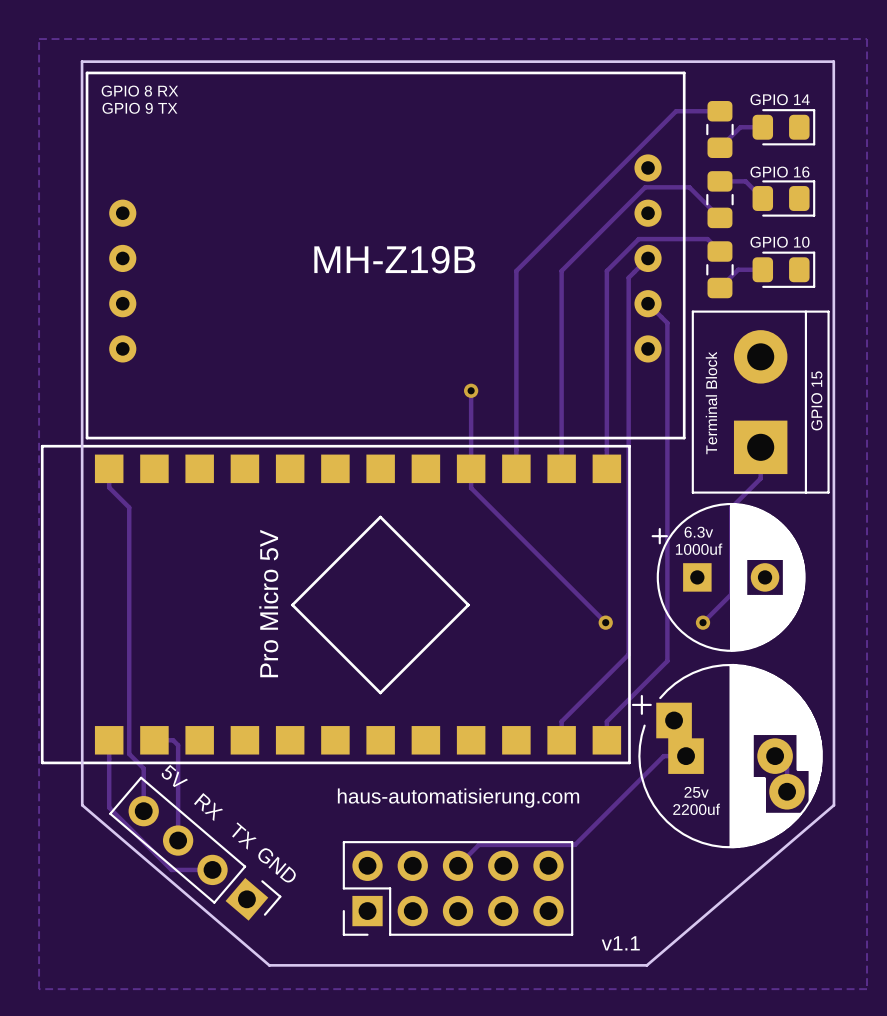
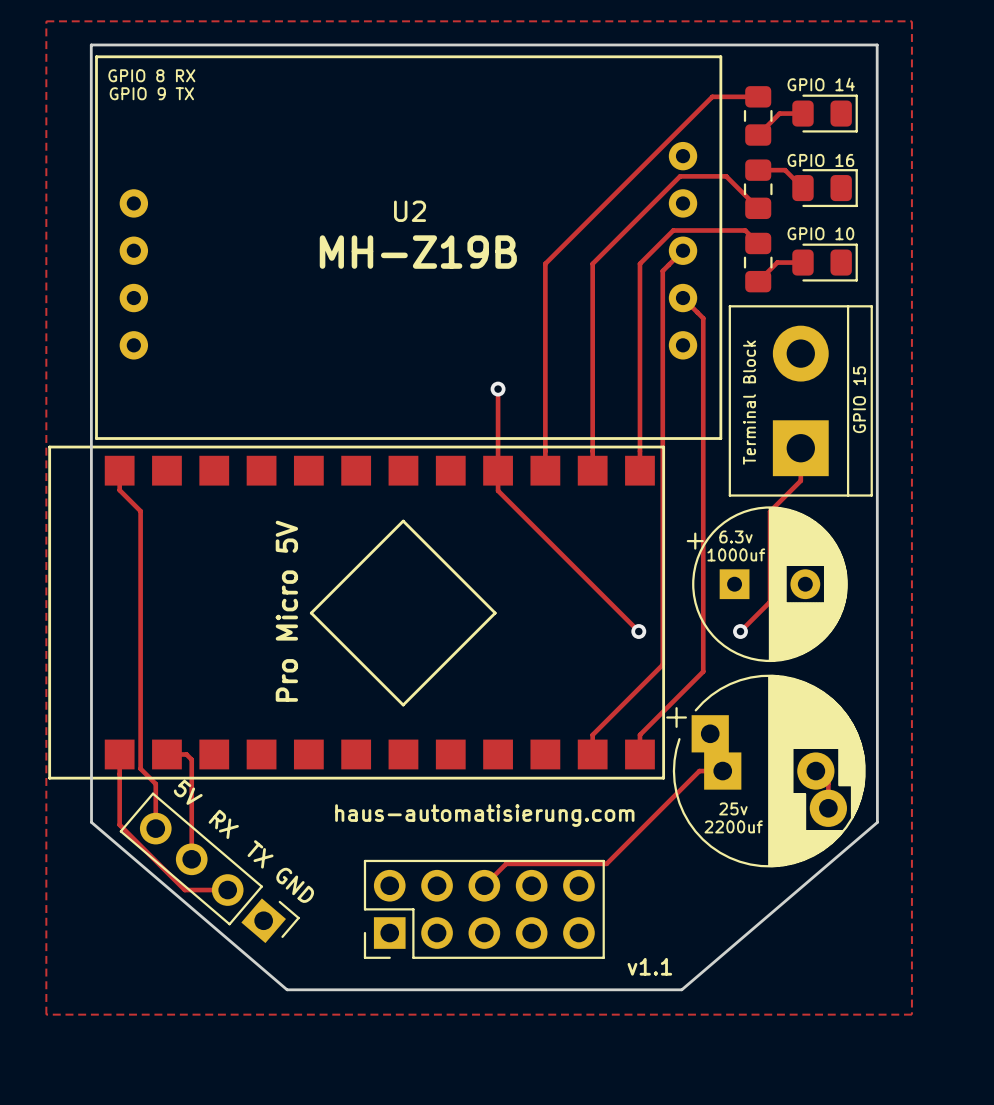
U2 name: none -> U2 (410, 211)

